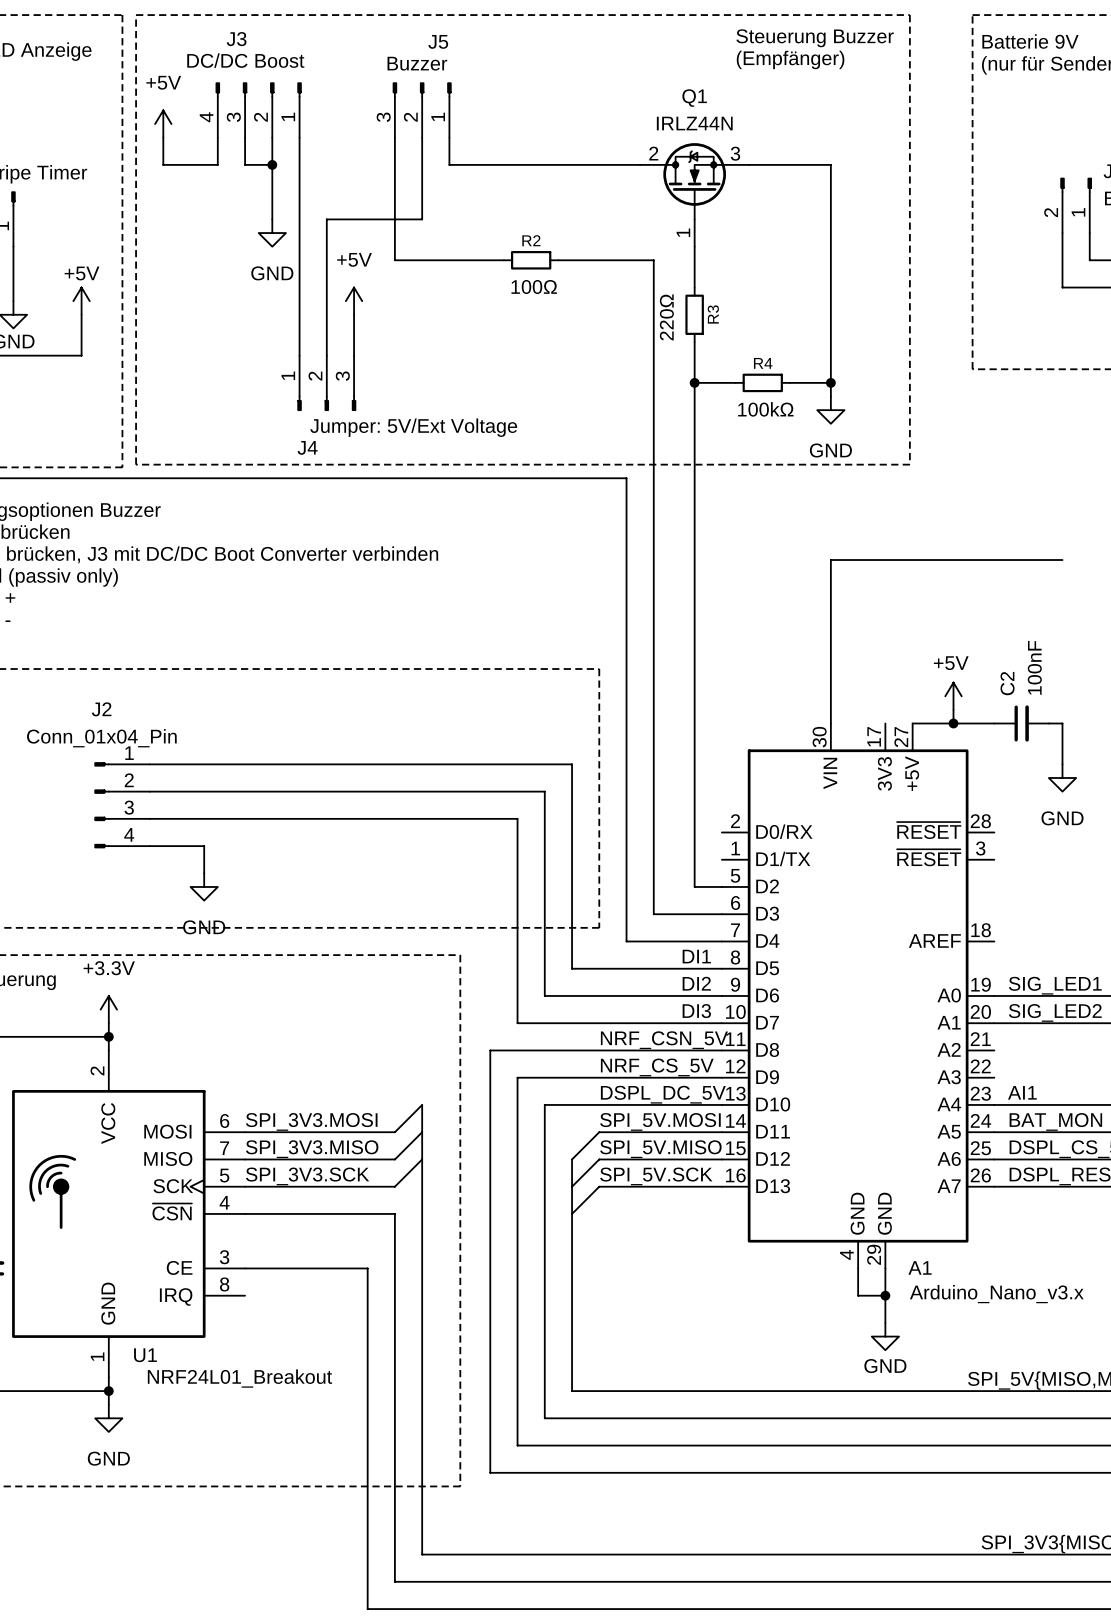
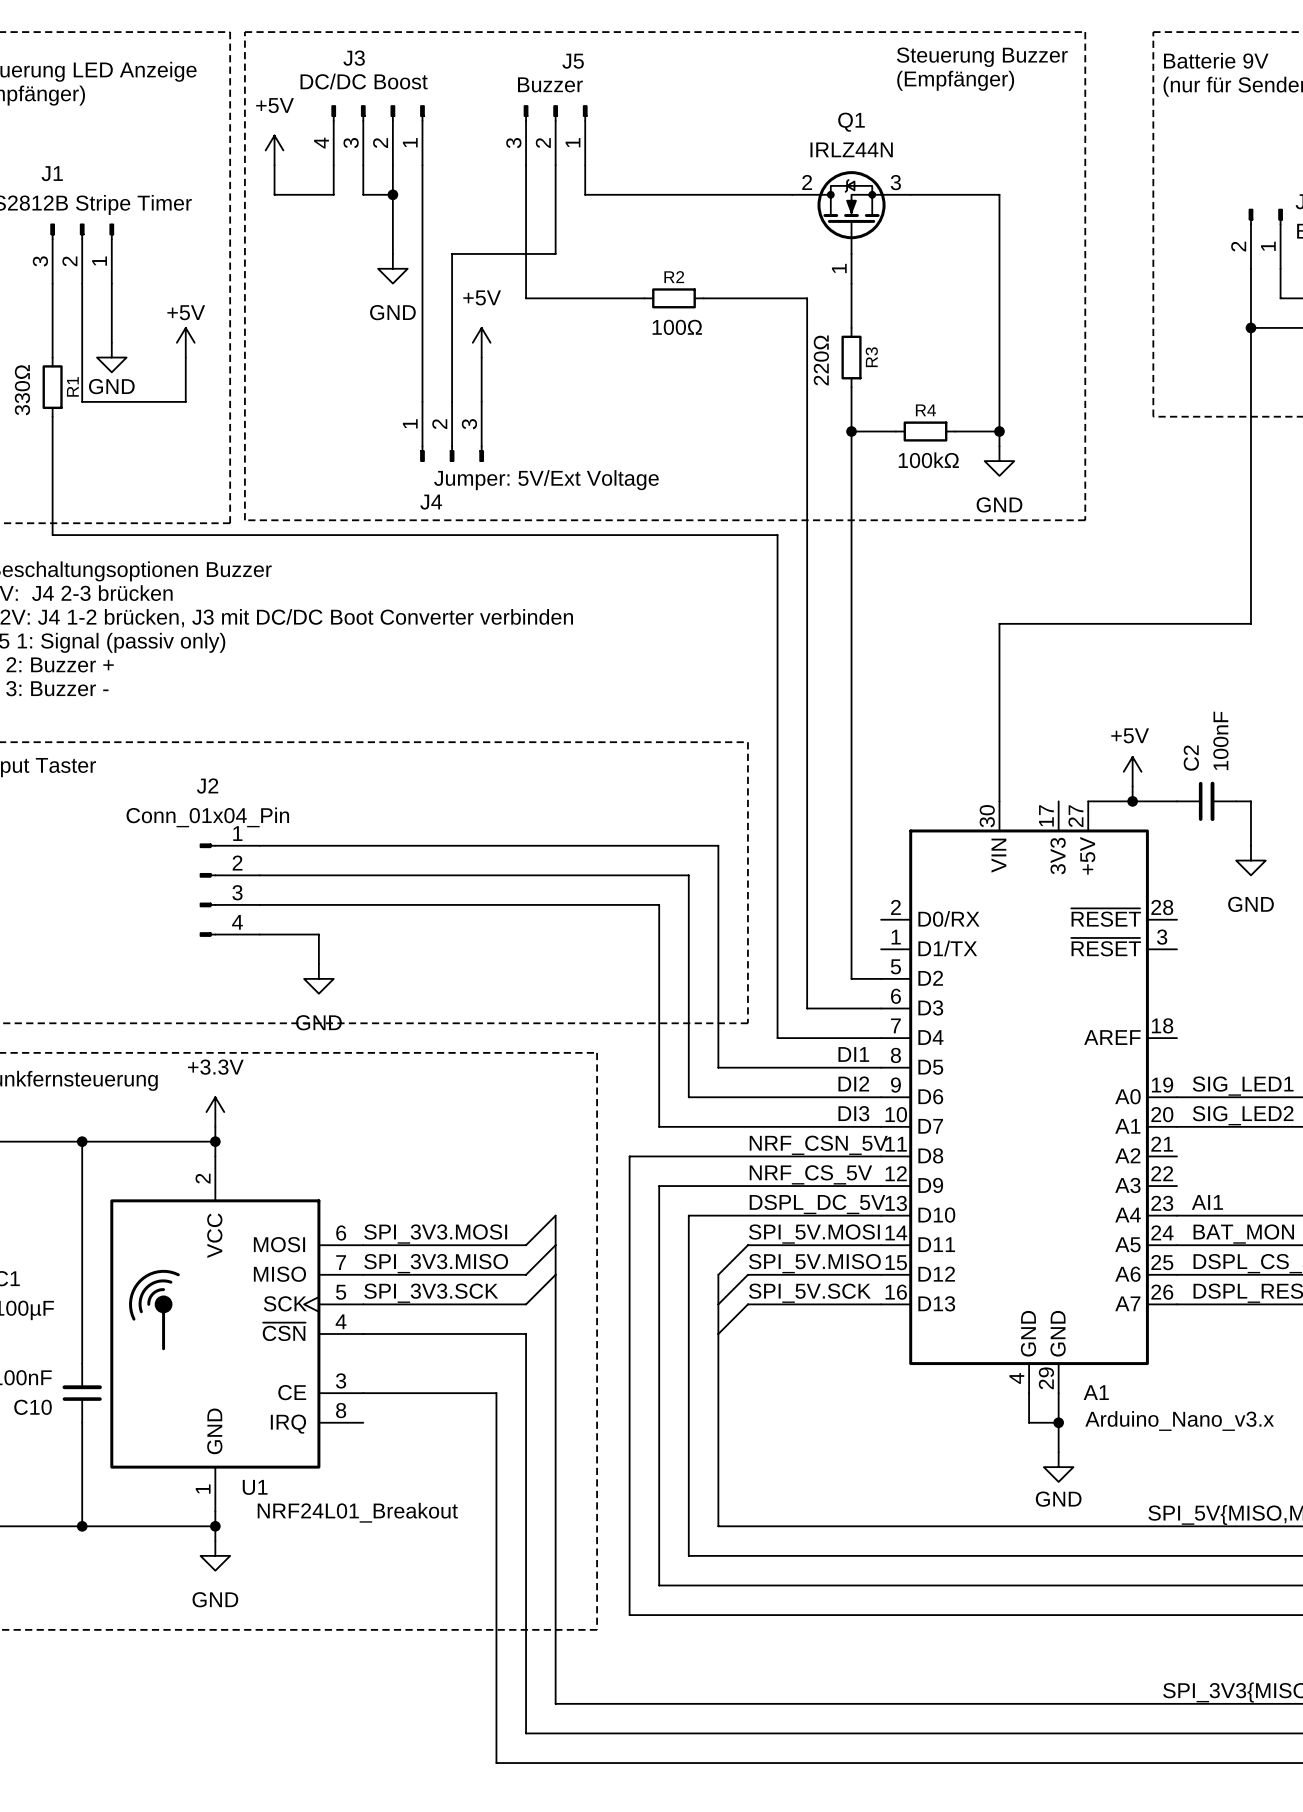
wire: none -> (1250, 327) (1250, 623)
junction: none -> (1250, 327)

